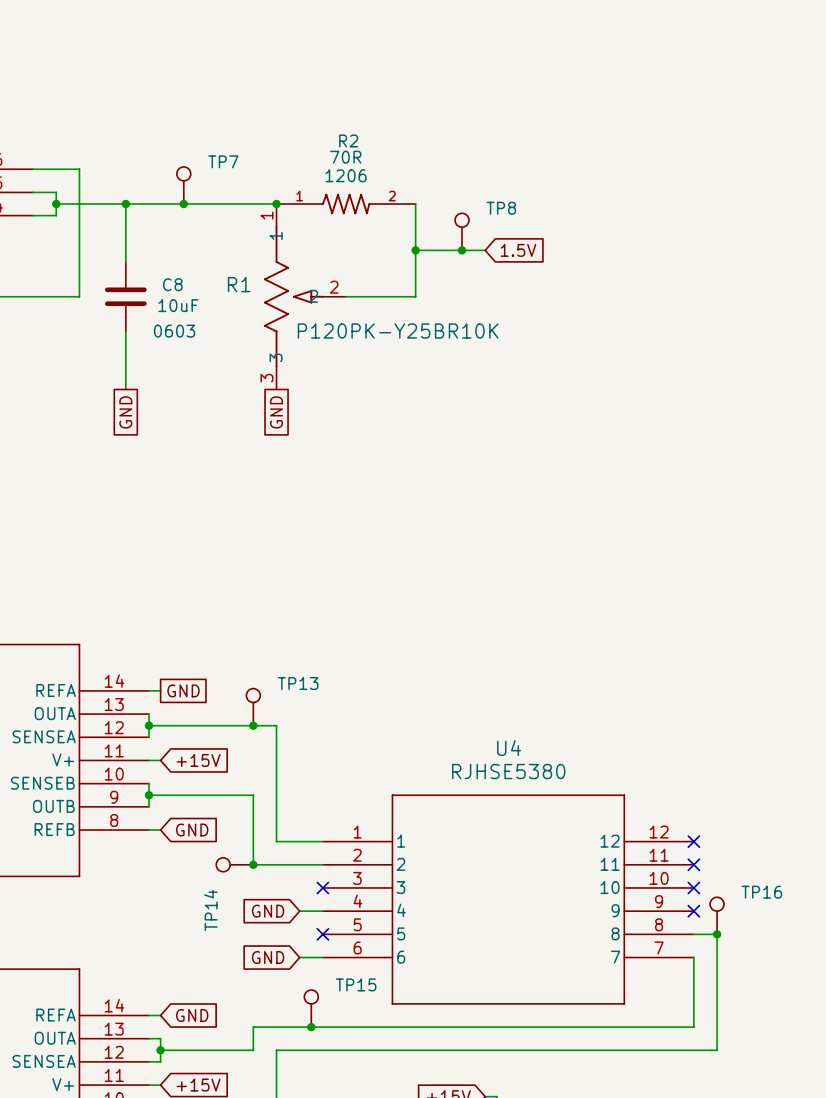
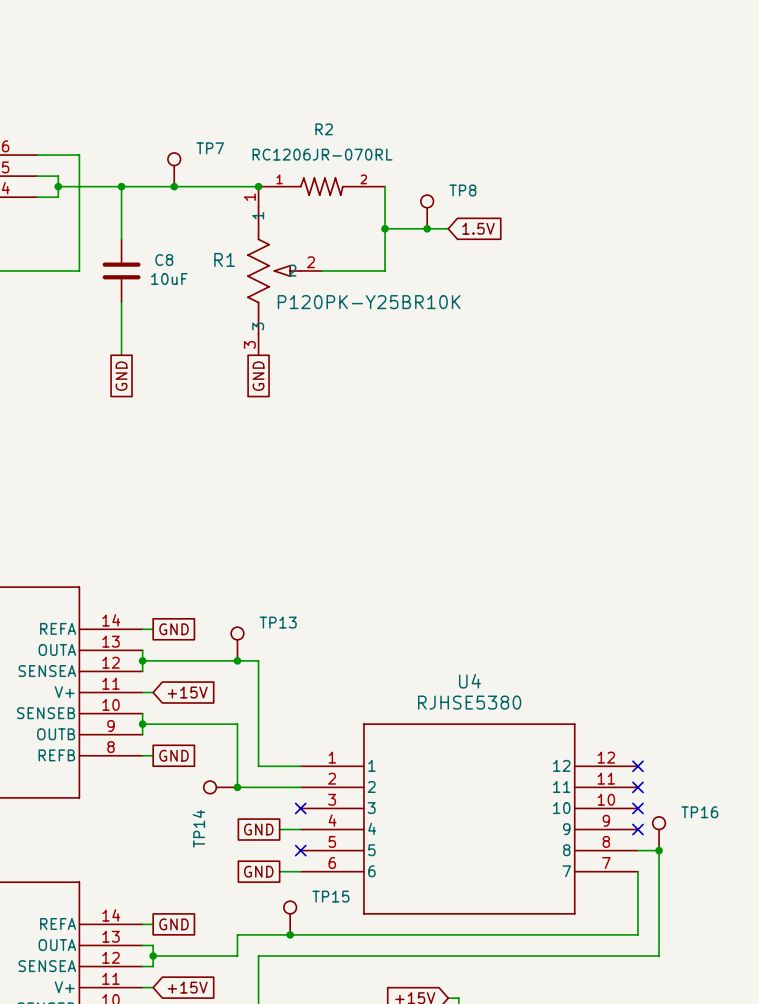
R2 value: 70R (345, 157) -> RC1206JR-070RL (322, 154)
R2 text: 1206 (346, 175) -> none
C8 text: 0603 (174, 331) -> none
global label shape: input (192, 830) -> passive (174, 755)
global label shape: input (268, 911) -> passive (258, 829)
global label shape: input (268, 957) -> passive (258, 871)
global label shape: input (192, 1015) -> passive (174, 924)

